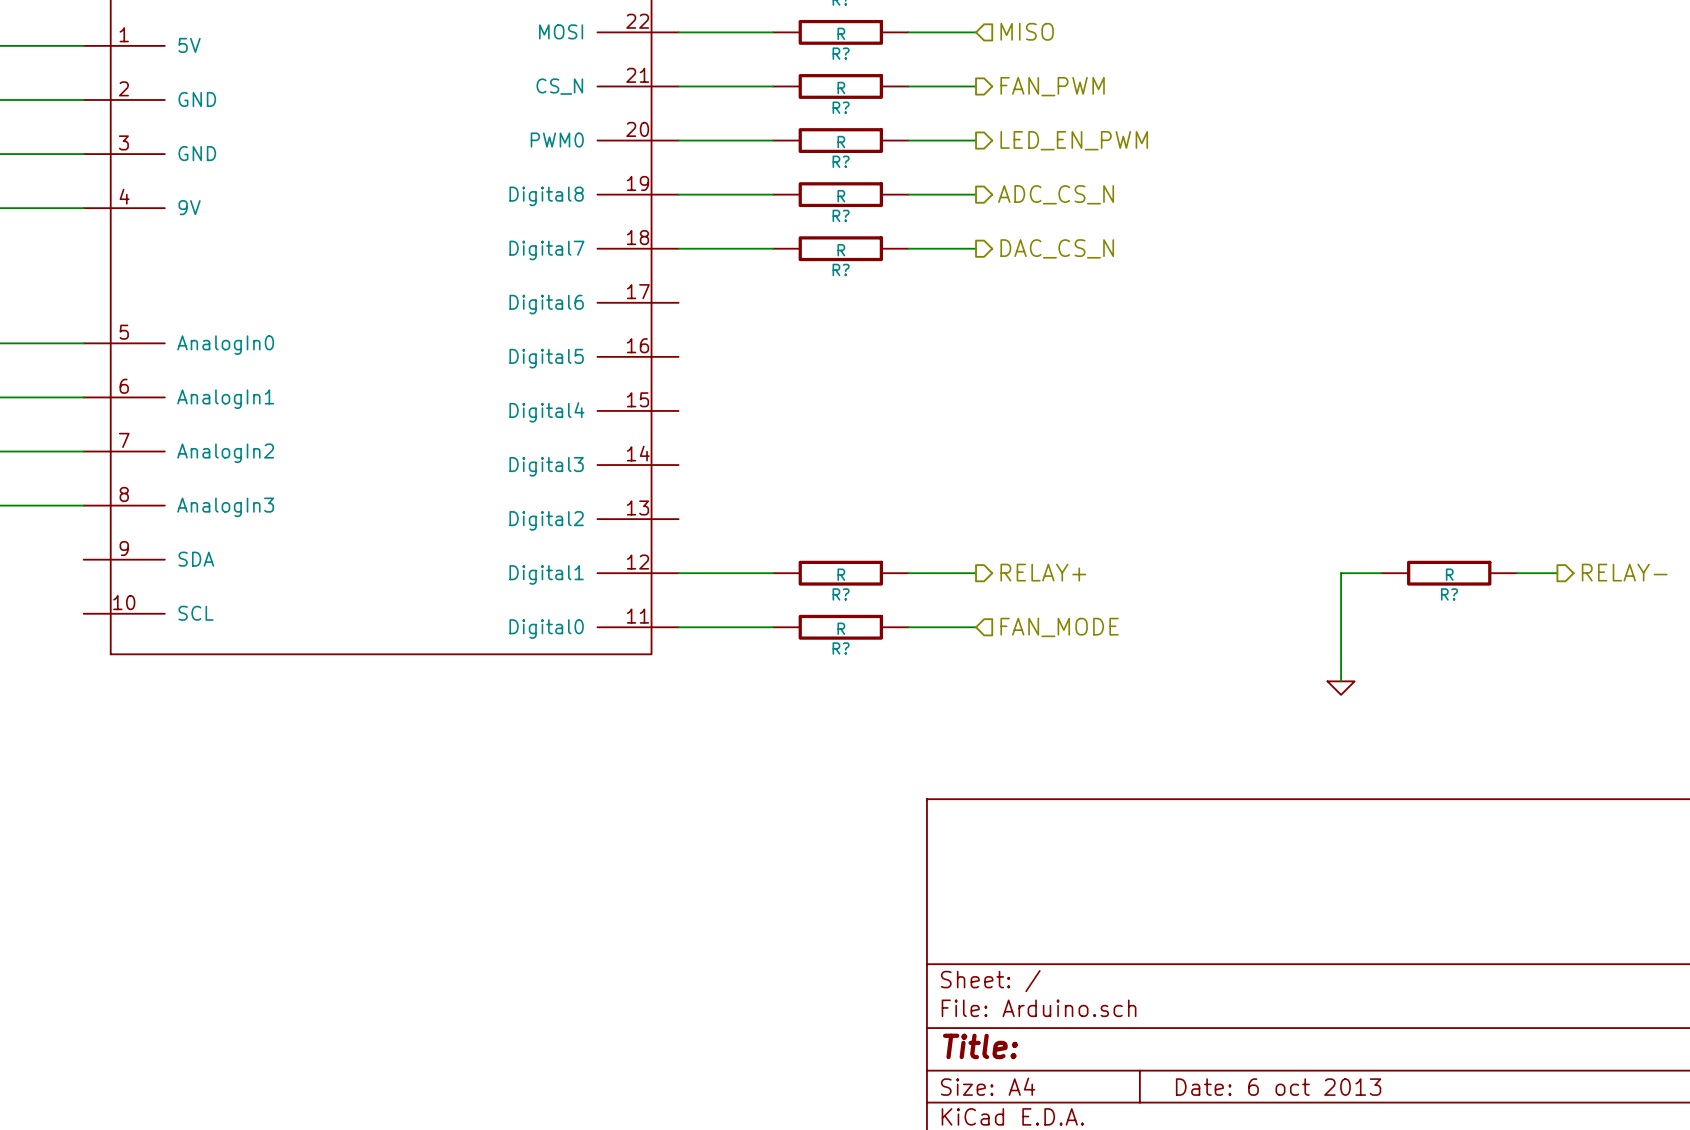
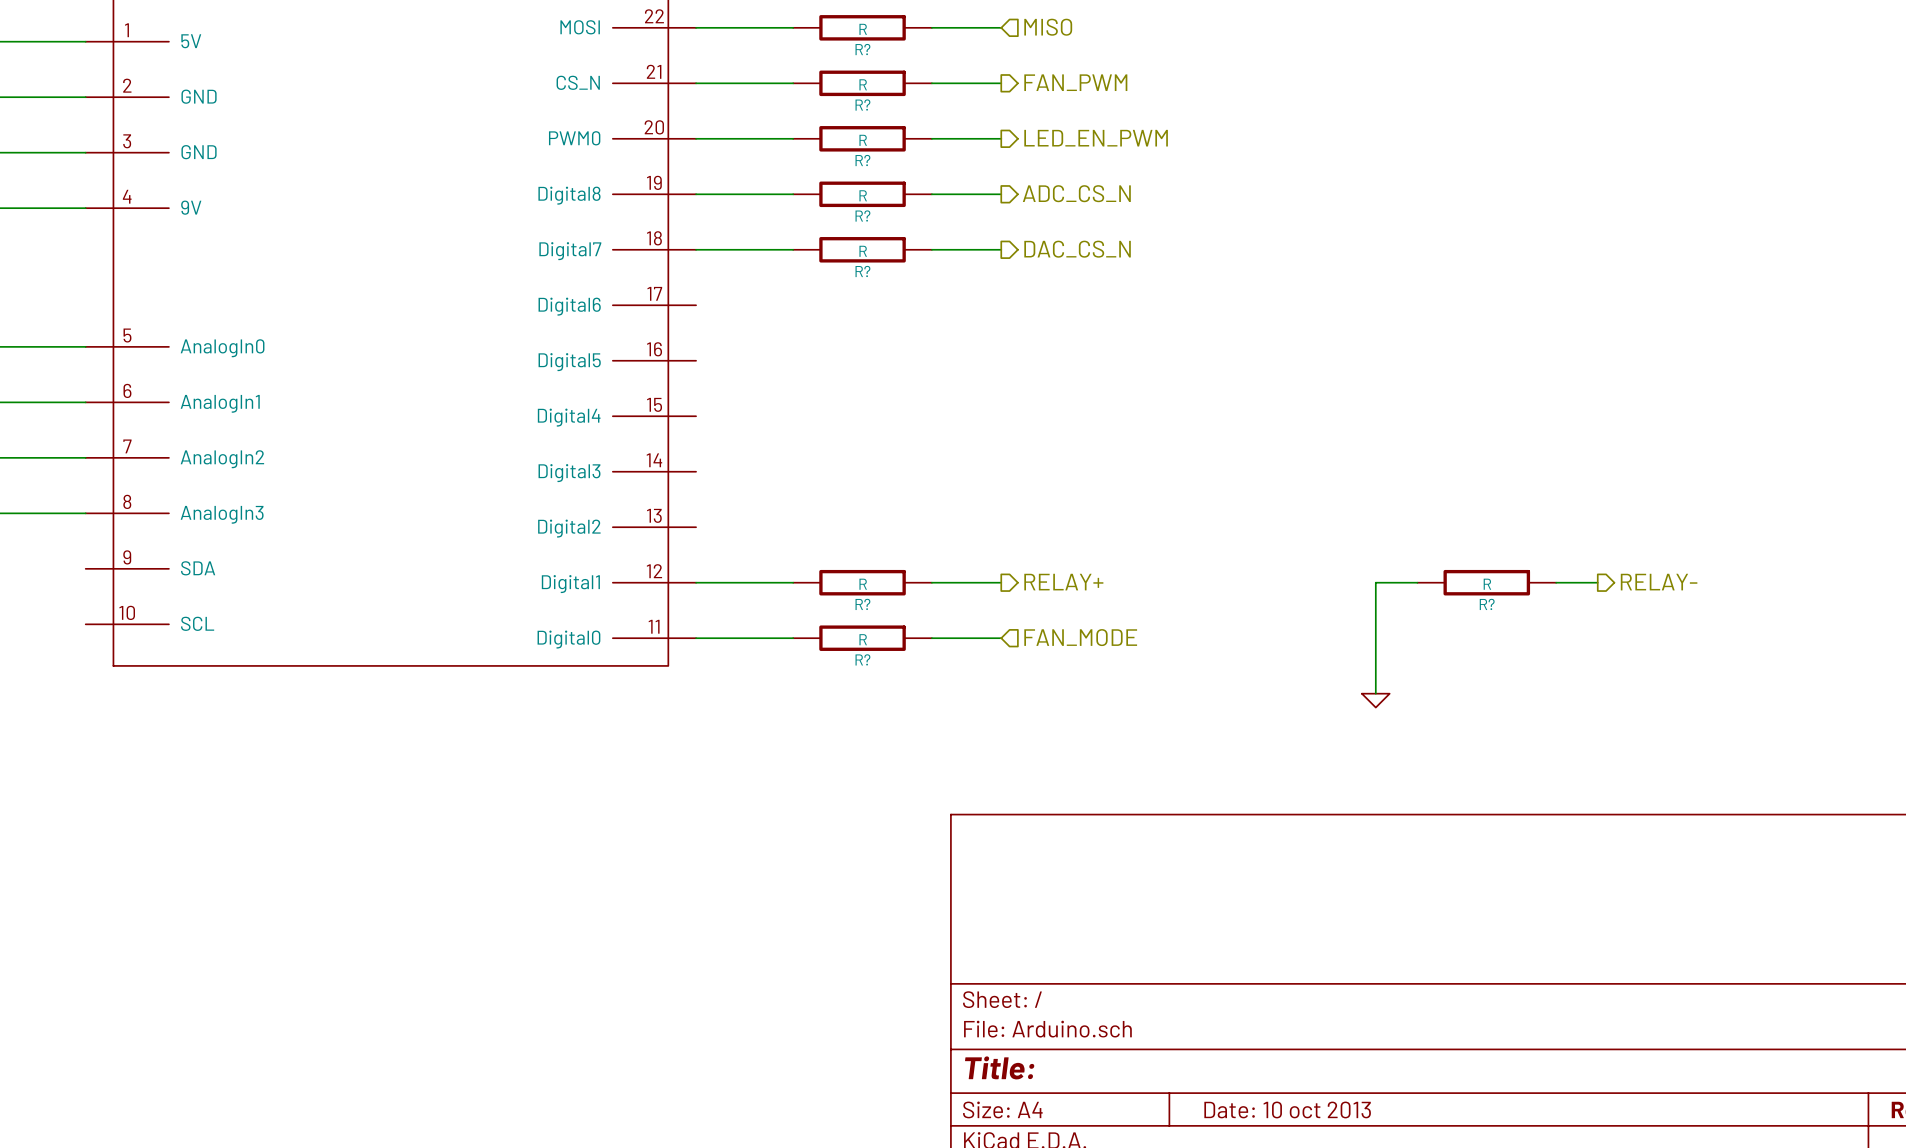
title block: Date: 6 oct 2013 (1278, 1087) -> Date: 10 oct 2013 (1287, 1109)

